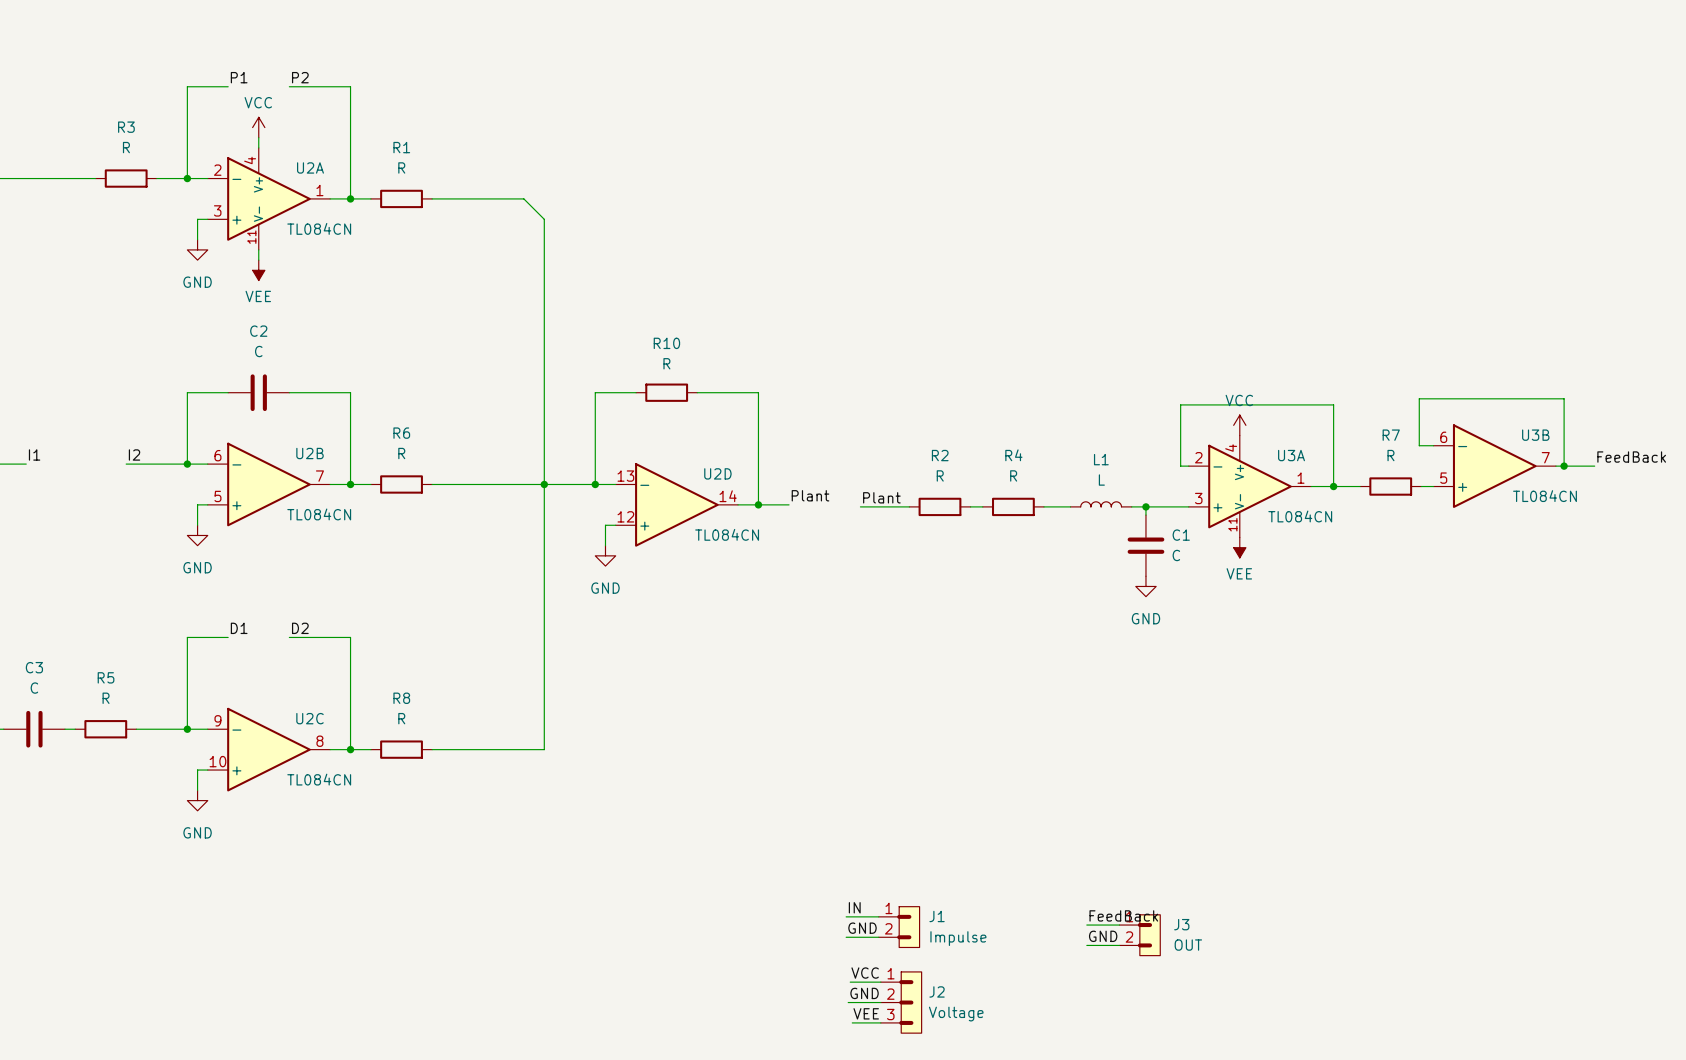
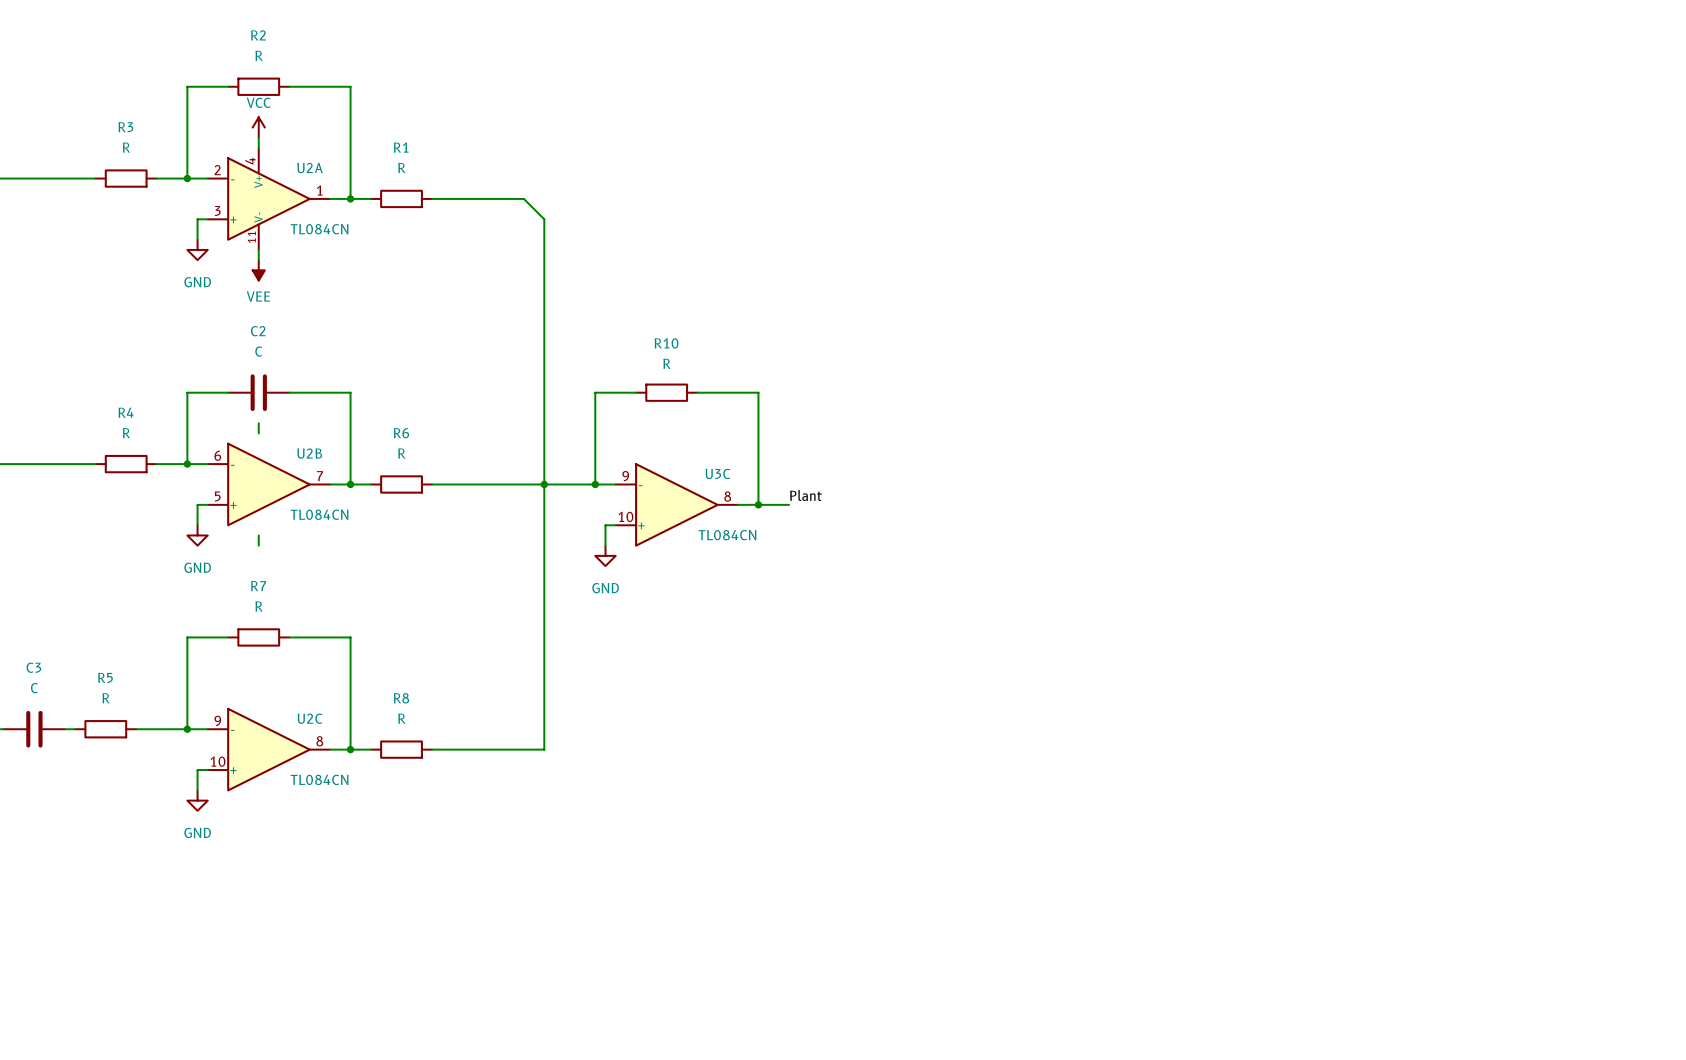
label: P1 (239, 77) -> none
label: P2 (300, 77) -> none
wire: none -> (258, 423) (258, 433)
power symbol: VCC (1239, 425) -> none
wire: (1433, 445) (1419, 445) (1419, 398) (1564, 398) (1564, 466) -> none
label: I1 (34, 454) -> none
label: I2 (134, 454) -> none
label: FeedBack (1631, 457) -> none
wire: none -> (26, 464) (95, 464)
wire: (126, 464) (156, 464) -> none
wire: (1188, 466) (1180, 466) (1180, 404) (1333, 404) (1333, 486) -> none
U3B: TL084CN (1494, 466) -> none
wire: (1555, 466) (1594, 466) -> none
junction: (1564, 466) -> none
U2D name: U2D (717, 473) -> U3C (717, 473)
U2D pin number: 13 (625, 476) -> 9 (625, 476)
U3A: TL084CN (1249, 486) -> none
wire: (1311, 486) (1360, 486) -> none
junction: (1333, 486) -> none
R7 position: (1390, 486) -> (258, 637)
wire: (1421, 486) (1433, 486) -> none
U2D pin number: 14 (728, 496) -> 8 (727, 496)
label: Plant (881, 497) -> none
L1: L (1101, 504) -> none
wire: (860, 506) (909, 506) -> none
R2 position: (939, 506) -> (258, 86)
wire: (970, 506) (982, 506) -> none
R4 position: (1013, 506) -> (126, 464)
wire: (1044, 506) (1070, 506) -> none
wire: (1131, 506) (1188, 506) -> none
wire: (1145, 506) (1145, 515) -> none
junction: (1145, 506) -> none
U2D pin number: 12 (625, 516) -> 10 (625, 516)
wire: none -> (258, 535) (258, 545)
C1: C (1145, 545) -> none
power symbol: VEE (1239, 547) -> none
power symbol: GND (1145, 586) -> none
label: D1 (239, 628) -> none
label: D2 (300, 628) -> none
label: IN (854, 907) -> none
label: FeedBack (1123, 915) -> none
wire: (846, 916) (878, 916) -> none
wire: (1086, 925) (1119, 925) -> none
J1: Impulse (899, 927) -> none
label: GND (862, 928) -> none
J3: OUT (1139, 935) -> none
label: GND (1103, 936) -> none
wire: (846, 937) (878, 937) -> none
wire: (1086, 945) (1119, 945) -> none
label: VCC (865, 973) -> none
wire: (850, 982) (880, 982) -> none
label: GND (864, 993) -> none
wire: (848, 1002) (880, 1002) -> none
J2: Voltage (901, 1002) -> none
label: VEE (866, 1013) -> none
wire: (852, 1022) (880, 1022) -> none

